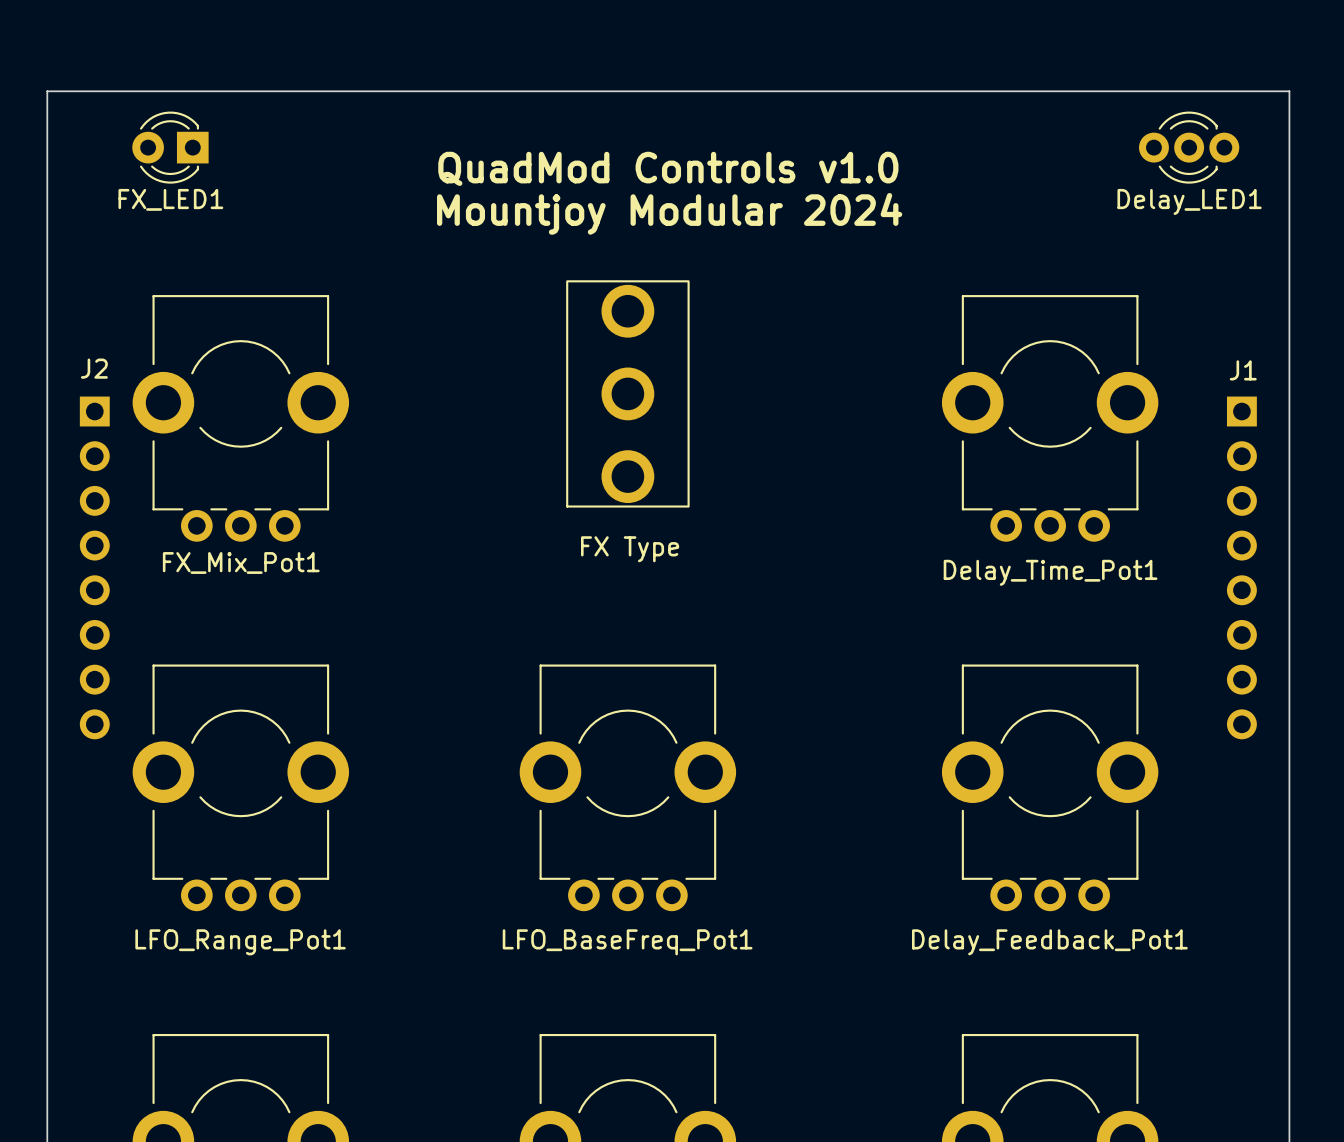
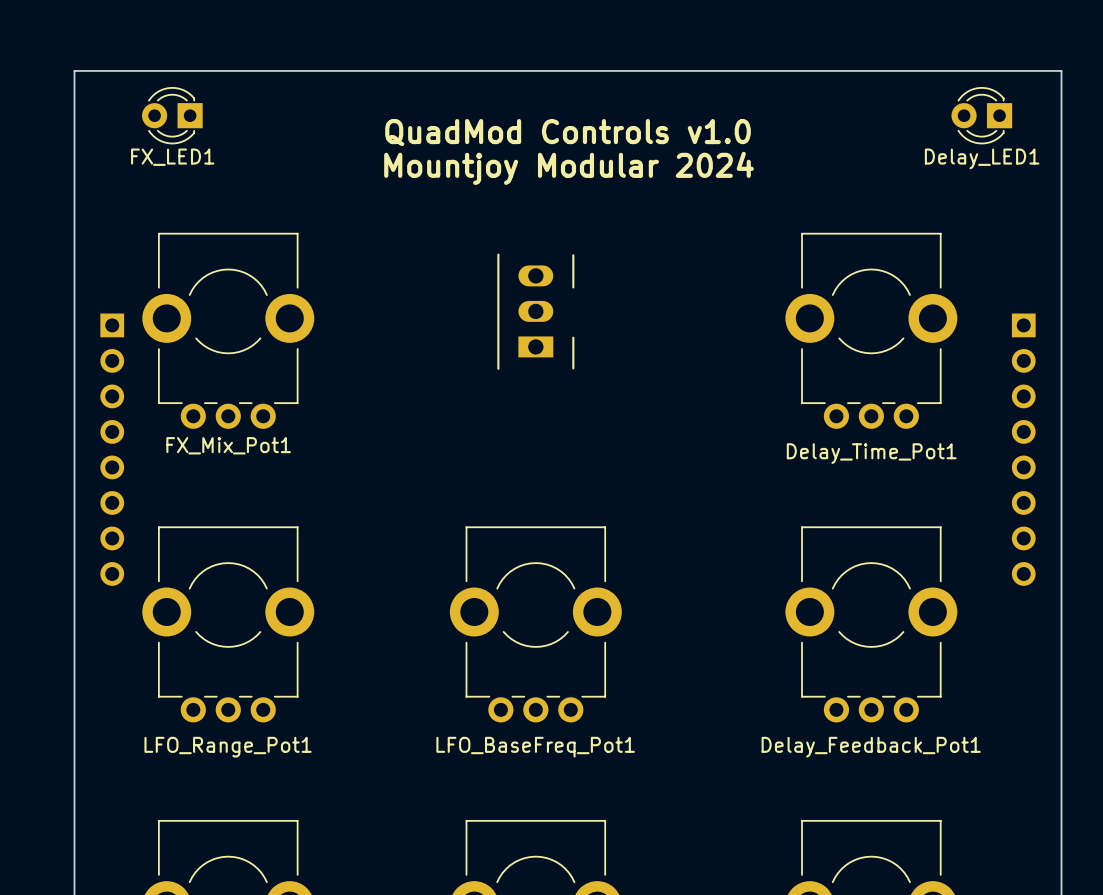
Delay_LED1 footprint: [1139, 111, 1240, 184] -> [951, 87, 1013, 145]
part footprint: [566, 280, 690, 508] -> [497, 253, 575, 370]
text: J2 (94, 368) -> none
text: J1 (1243, 370) -> none
text: FX Type (630, 549) -> none

